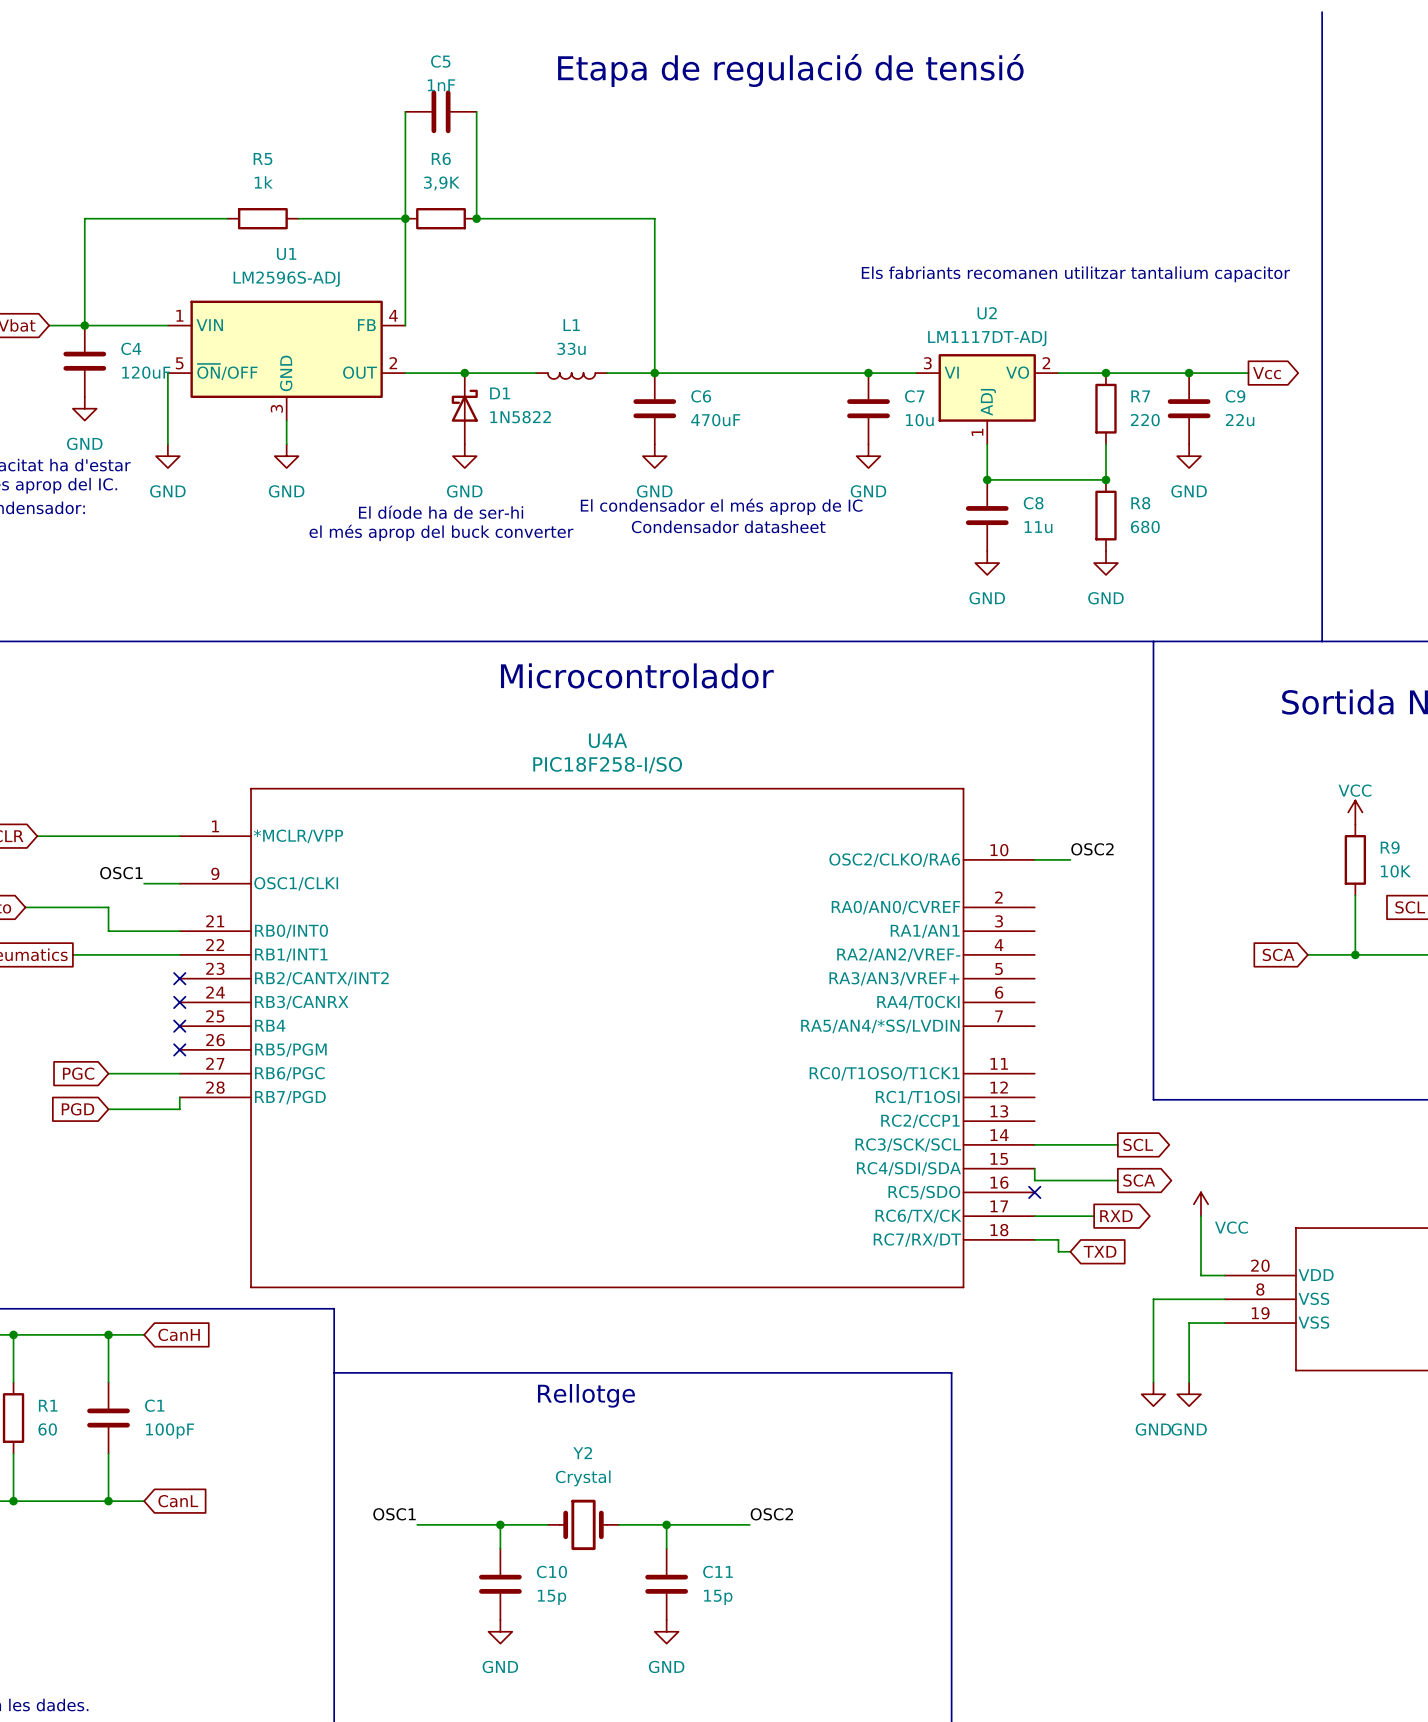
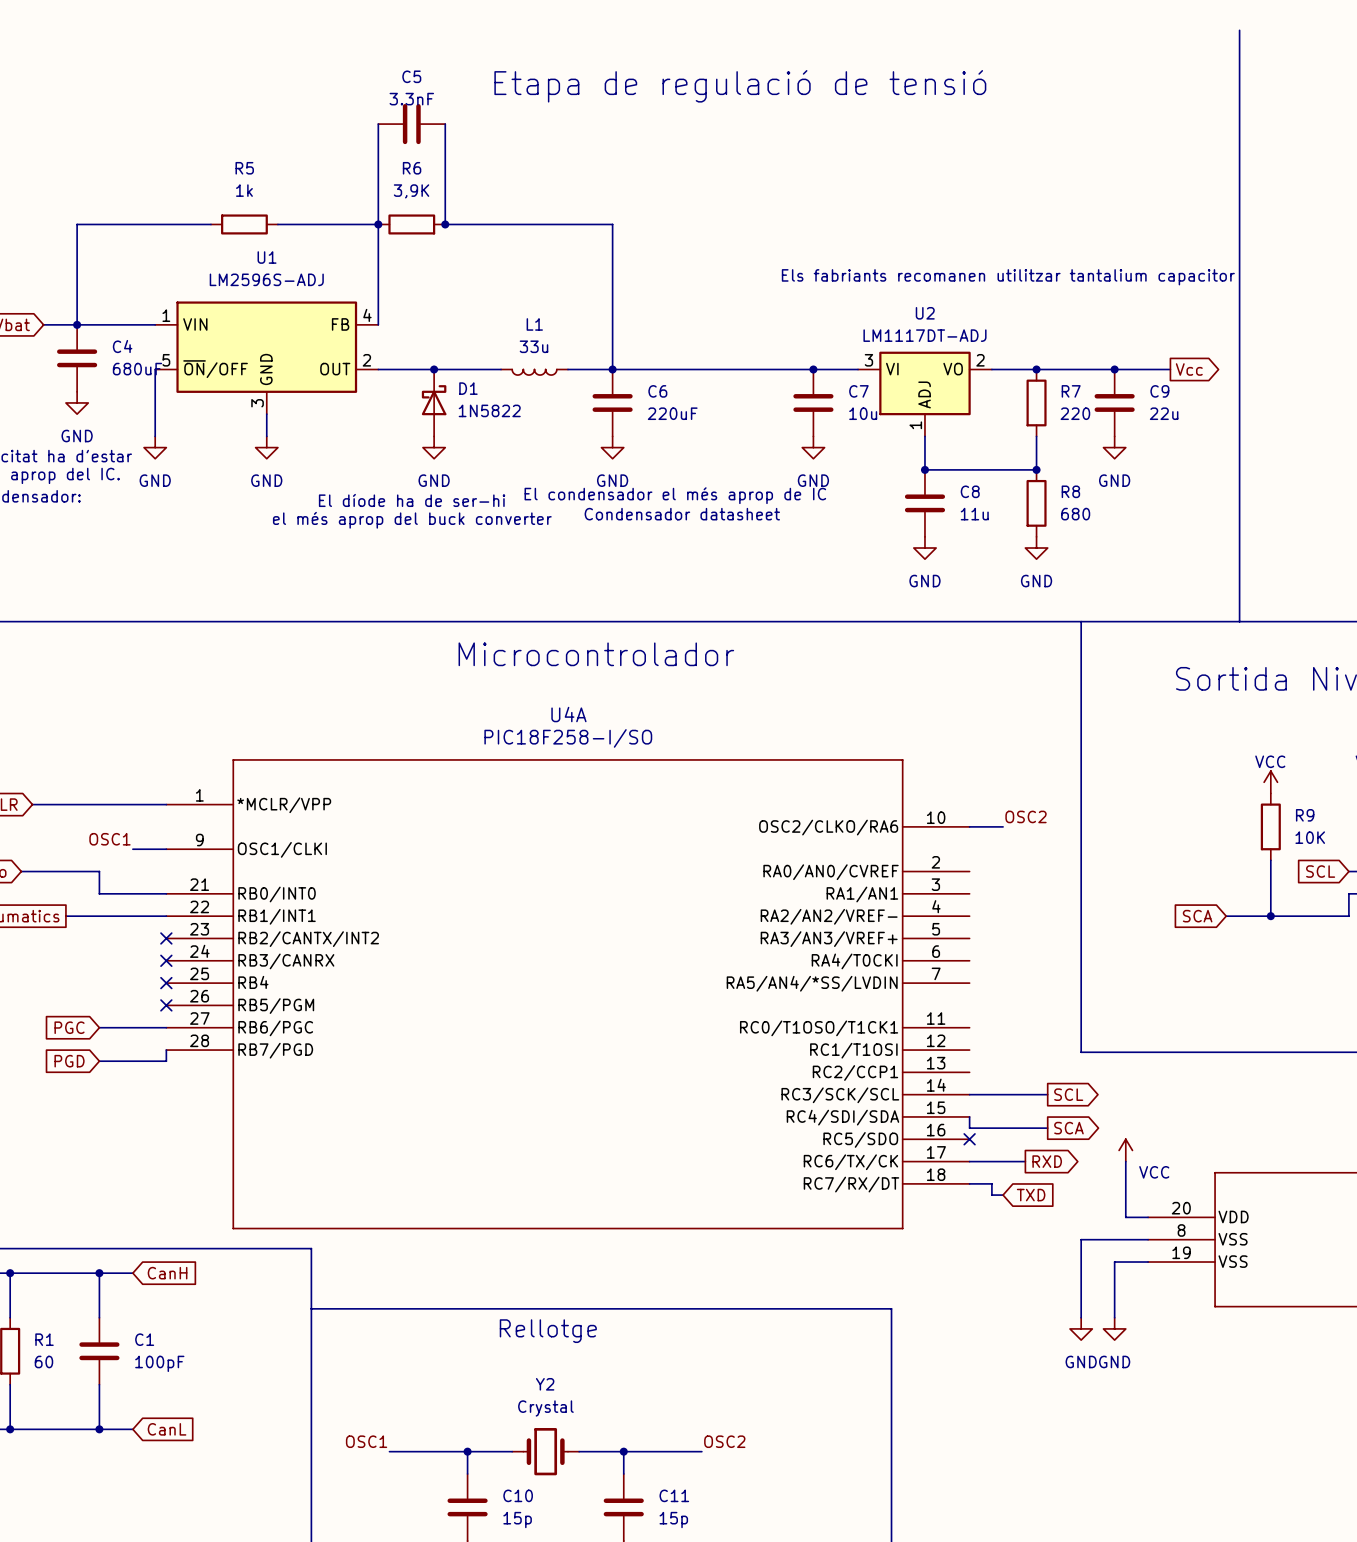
C5 value: 1nF (441, 85) -> 3.3nF (411, 99)
C4 value: 120uF (146, 372) -> 680uF (137, 369)
C6 value: 470uF (715, 420) -> 220uF (672, 413)

